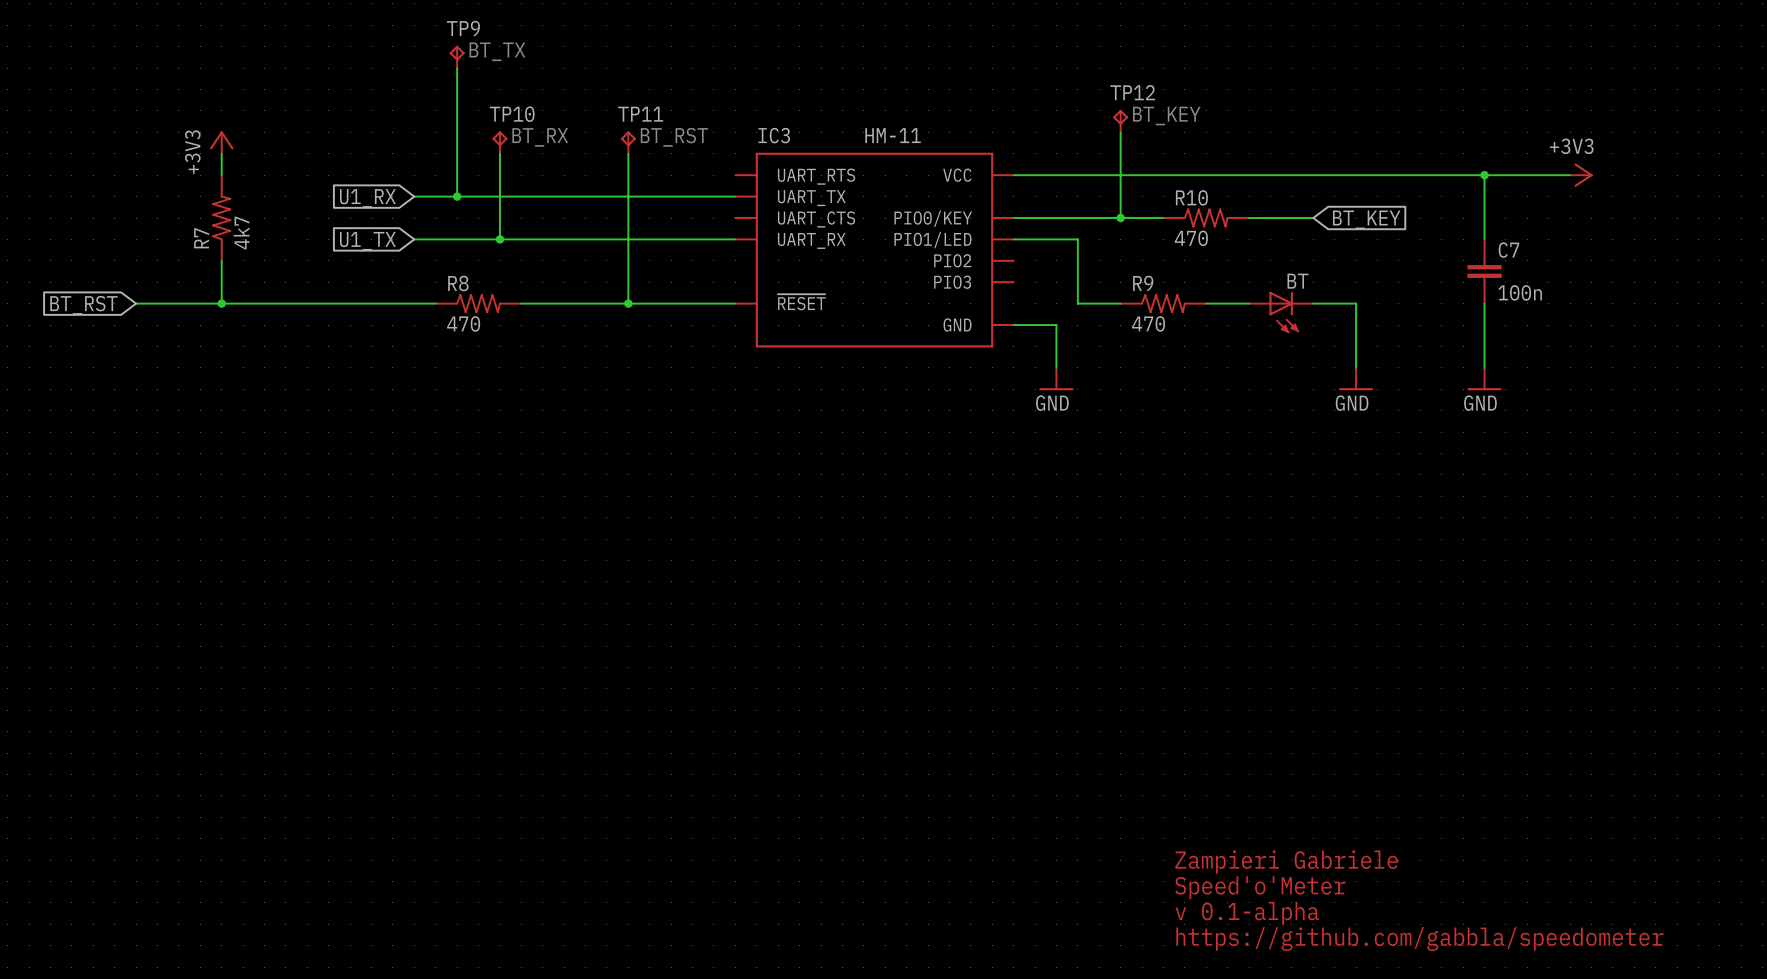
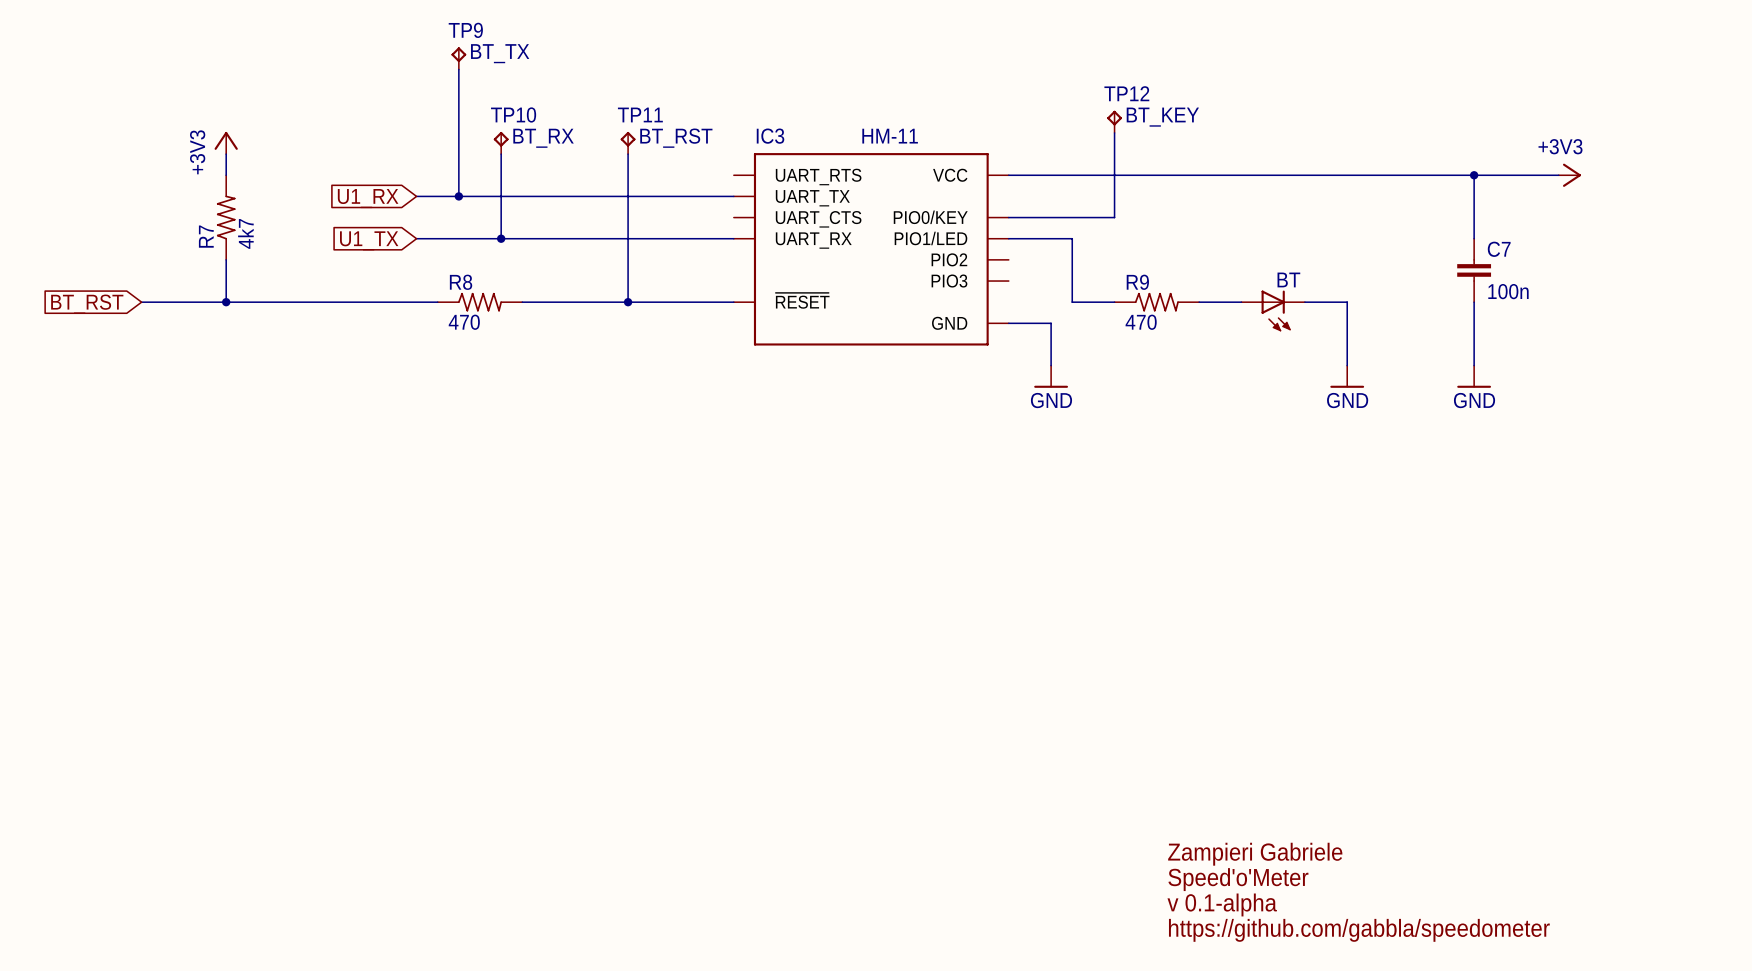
wire: (1120, 218) (1163, 218) -> none
junction: (1120, 218) -> none
R10: 470 (1206, 218) -> none
wire: (1249, 218) (1313, 218) -> none
global label: BT_KEY (1366, 219) -> none

